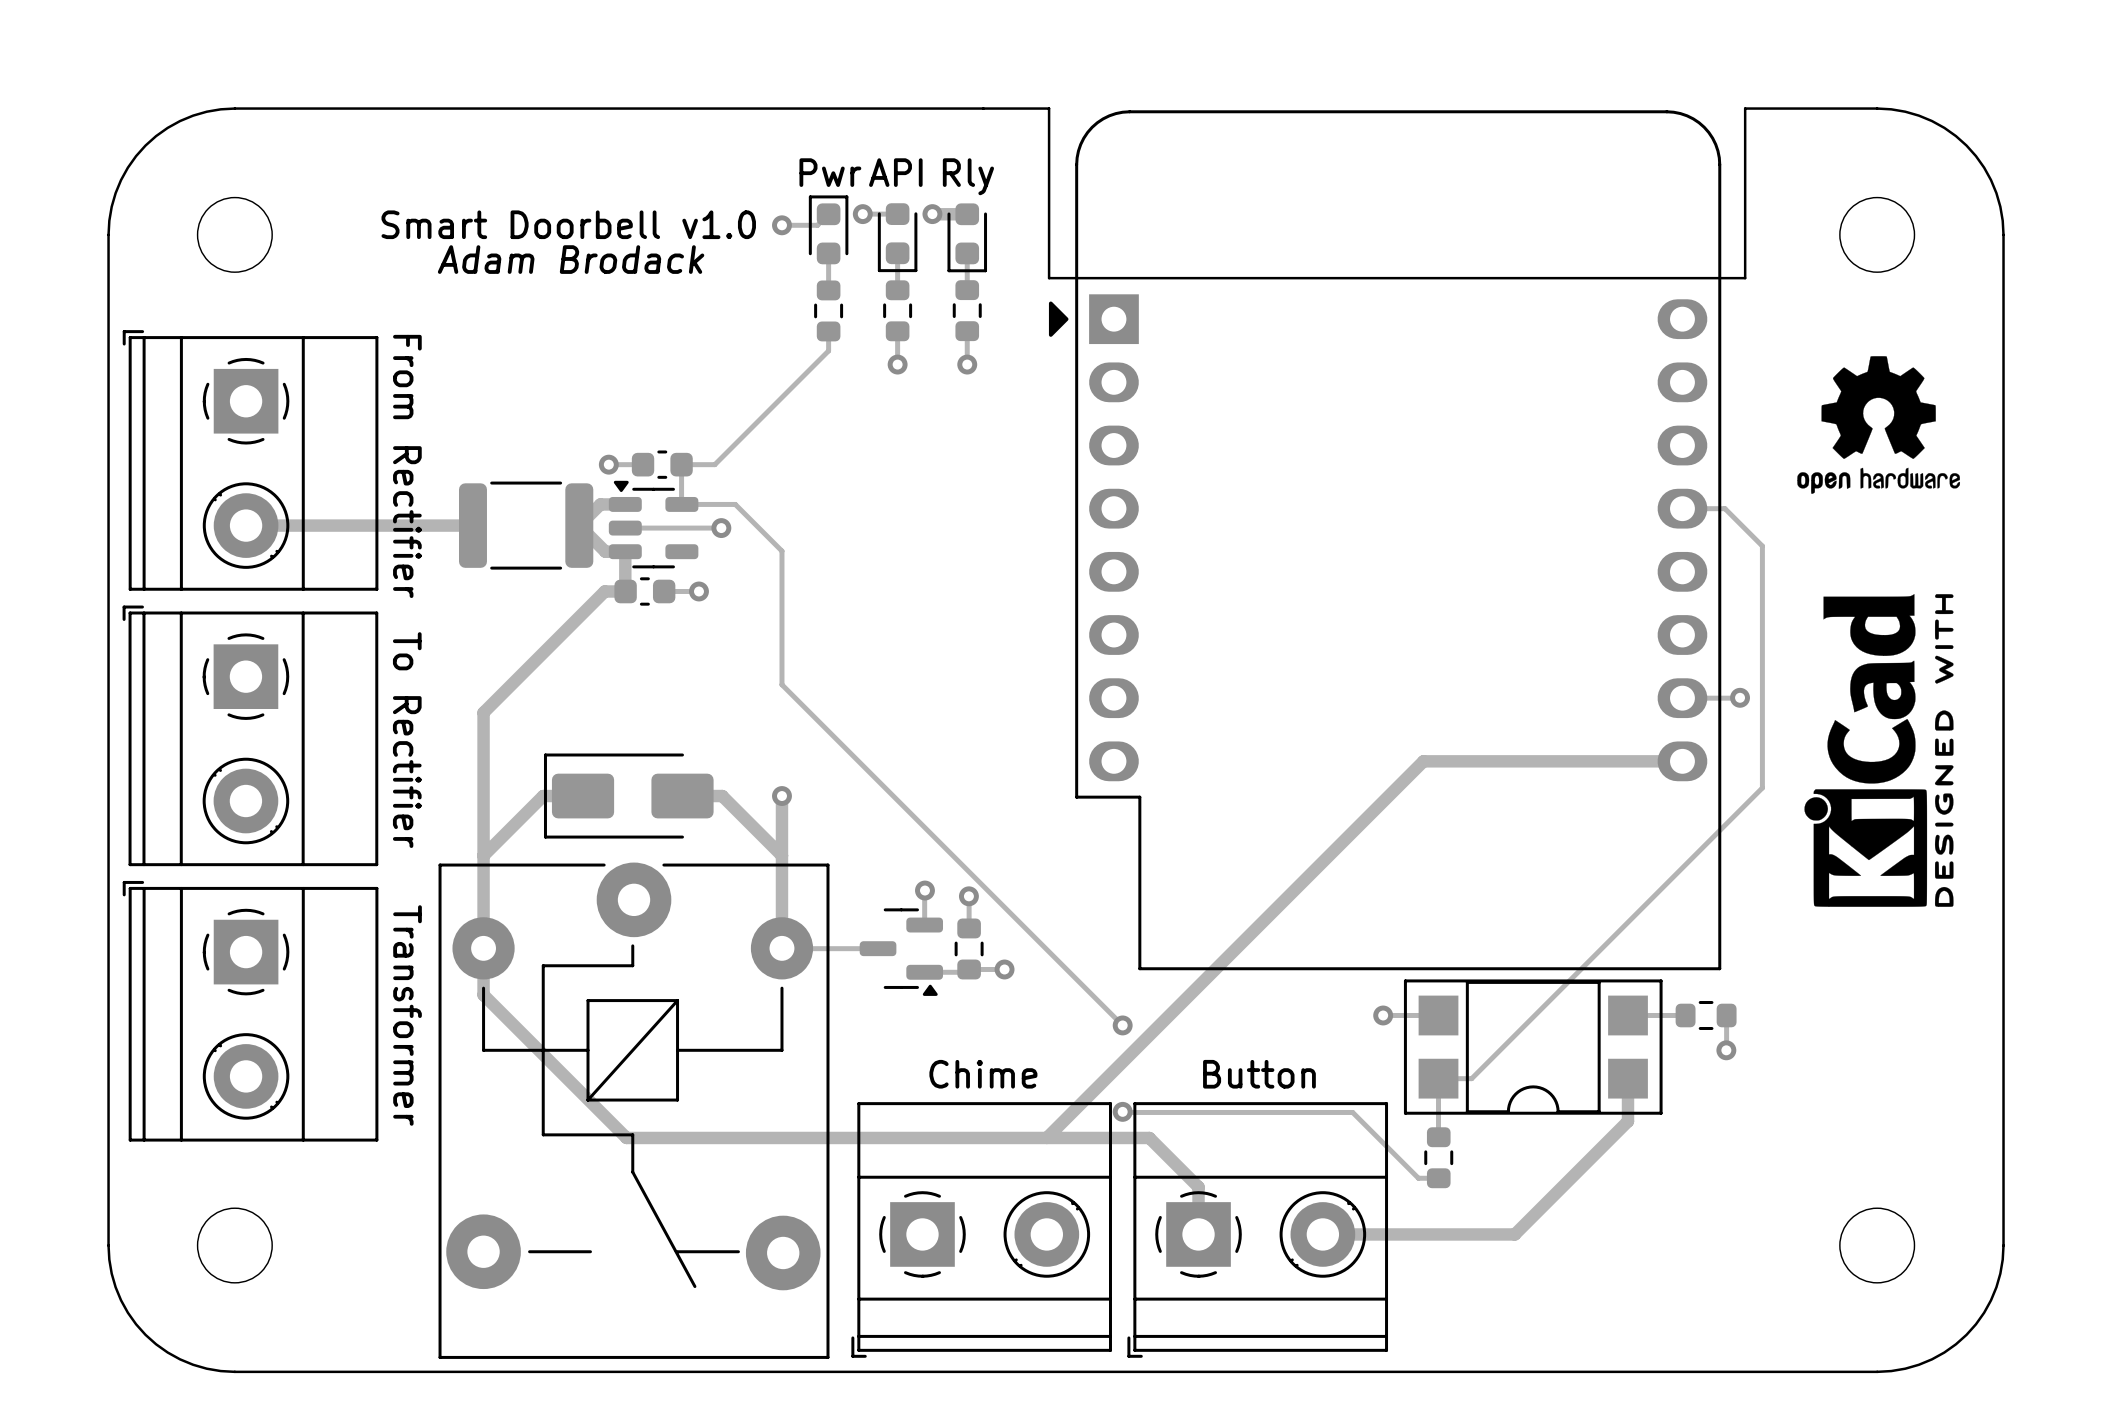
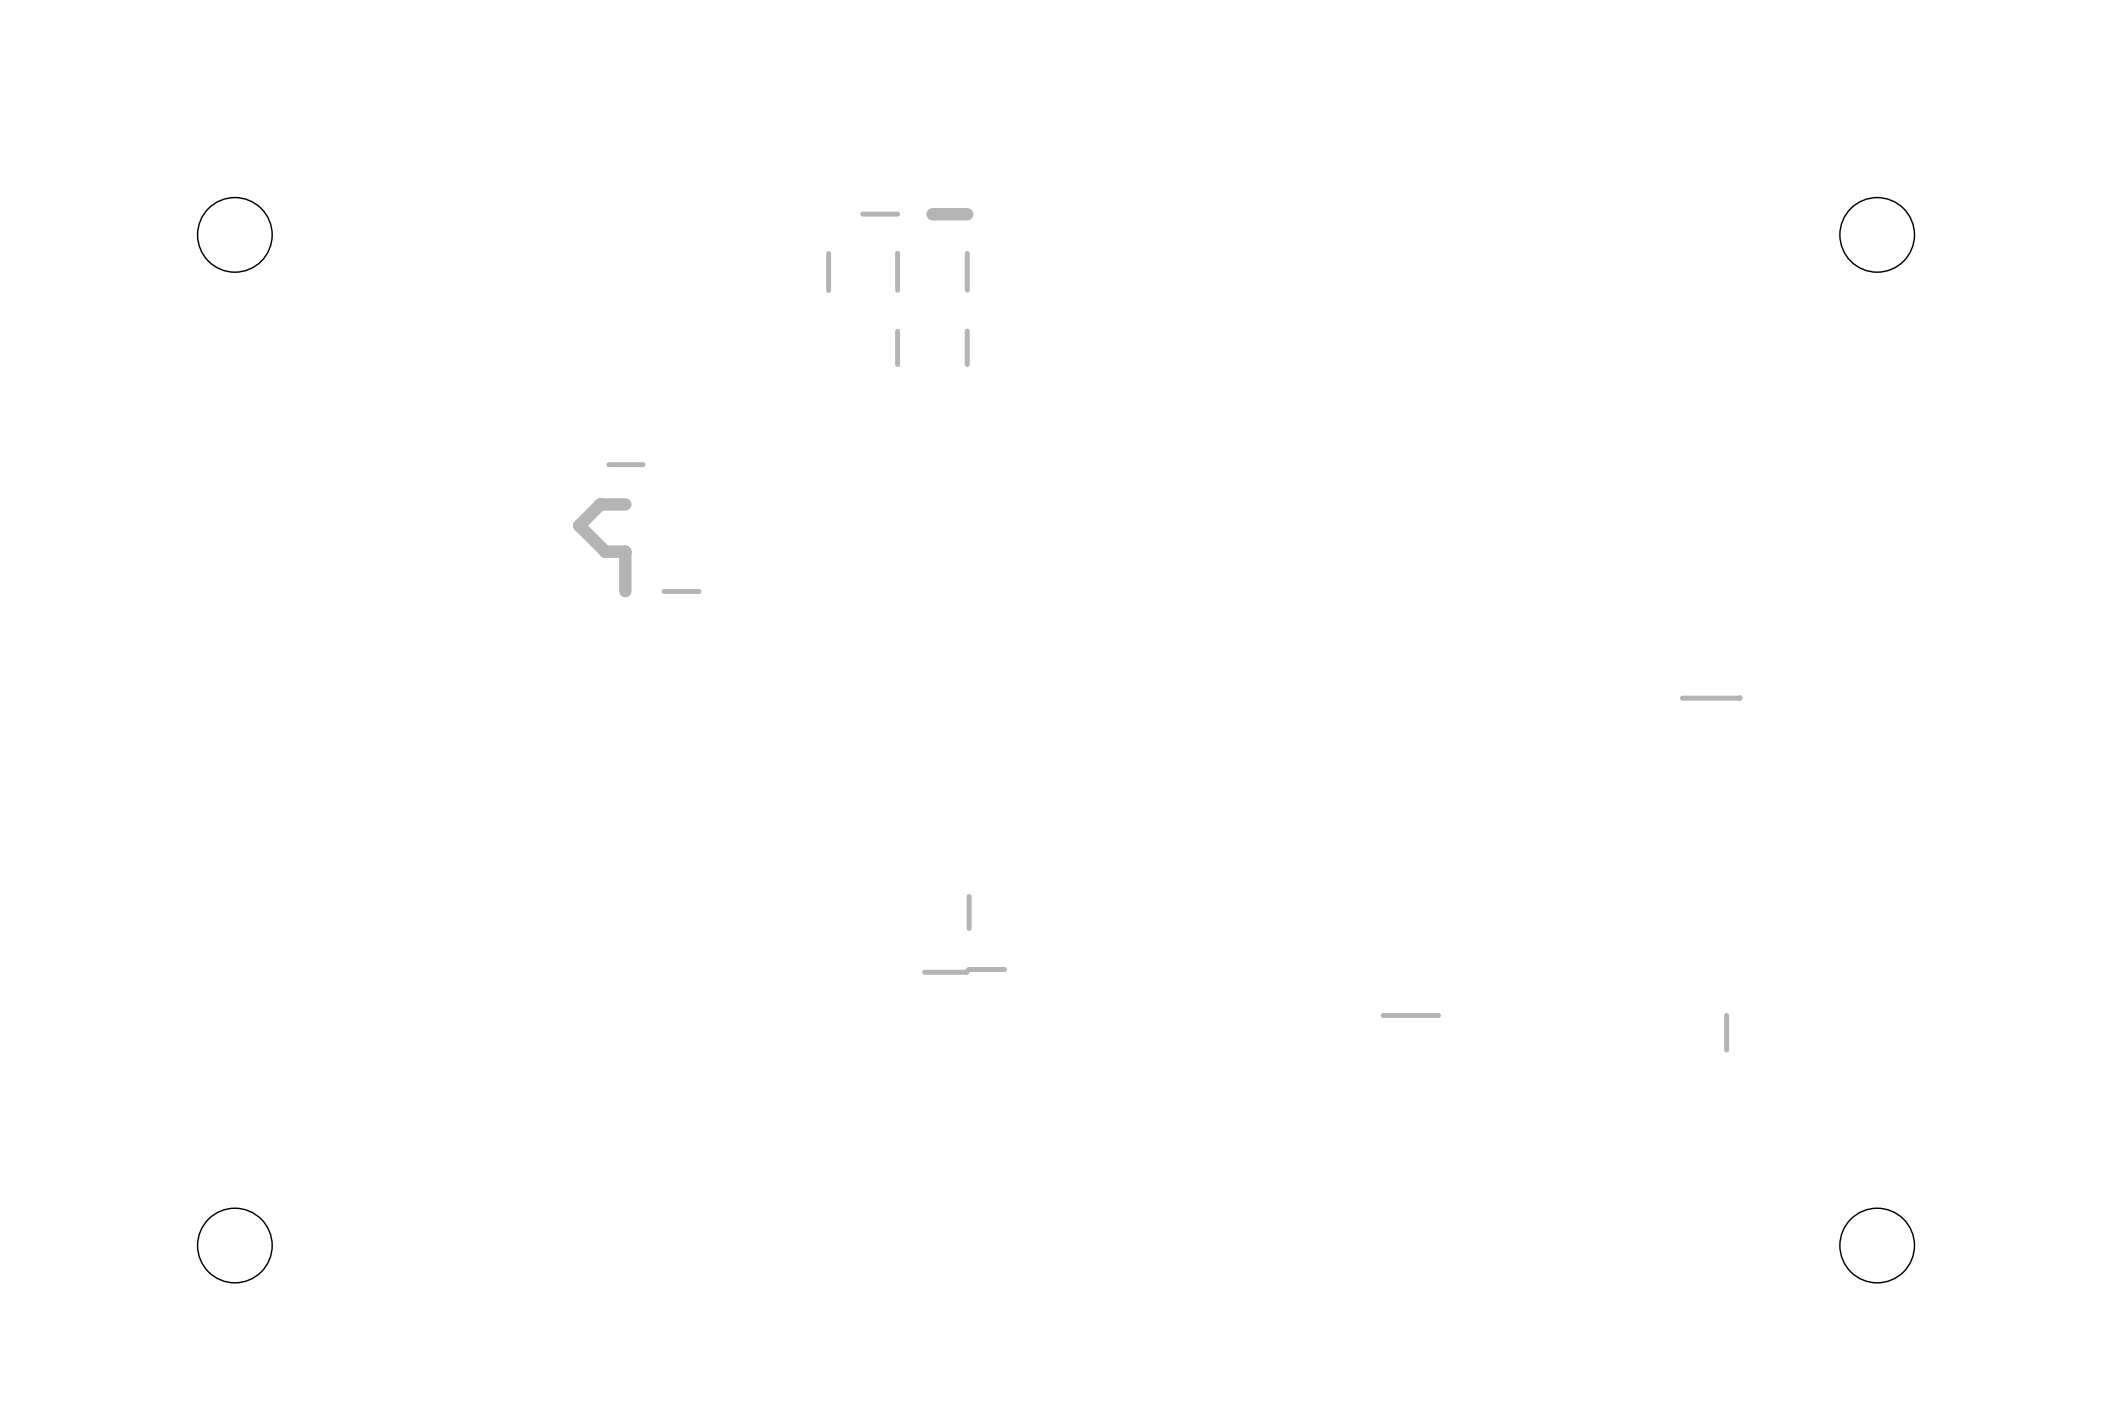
board edge: (234, 108) (1049, 108) (1049, 278) (1745, 278) (1745, 108) (1891, 109) (1918, 115) (1944, 127) (1966, 145) (1984, 167) (1991, 180) (2000, 206) (2003, 234) (2003, 1245) (2000, 1273) (1991, 1300) (1984, 1312) (1966, 1334) (1944, 1352) (1918, 1364) (1905, 1368) (1877, 1371) (234, 1371) (220, 1371) (193, 1364) (167, 1352) (145, 1334) (136, 1324) (121, 1300) (111, 1273) (108, 1245) (108, 234) (109, 220) (115, 193) (127, 167) (145, 145) (167, 127) (180, 121) (206, 111) (234, 108) -> none
text: Pwr (830, 172) -> none
text: API (895, 172) -> none
text: Rly (968, 176) -> none
track: (828, 214) (817, 225) (781, 225) -> none
via: (862, 214) -> none
via: (932, 214) -> none
text: Smart Doorbell v1.0 (568, 224) -> none
via: (781, 225) -> none
part: (828, 229) -> none
part: (897, 237) -> none
part: (967, 237) -> none
text: Adam Brodack (571, 259) -> none
part: (828, 310) -> none
part: (897, 310) -> none
part: (967, 310) -> none
track: (828, 331) (828, 350) (714, 464) (681, 464) (681, 504) -> none
drawing: [1797, 356, 1961, 494] -> none
via: (897, 364) -> none
via: (967, 364) -> none
part: (250, 460) -> none
via: (608, 464) -> none
part: (662, 464) -> none
text: From Rectifier (407, 466) -> none
track: (681, 504) (735, 504) (781, 551) (781, 684) (1122, 1025) -> none
track: (1682, 508) (1724, 508) (1762, 546) (1762, 787) (1471, 1078) (1438, 1078) (1438, 1136) -> none
part: (653, 524) -> none
track: (246, 525) (472, 525) -> none
part: (526, 525) -> none
track: (625, 528) (721, 528) -> none
via: (721, 528) -> none
part: (1385, 540) -> none
track: (625, 591) (604, 591) (483, 712) (483, 994) (626, 1137) (1149, 1137) (1198, 1187) (1198, 1234) -> none
part: (644, 591) -> none
via: (698, 591) -> none
drawing: [1804, 594, 1954, 907] -> none
via: (1740, 697) -> none
part: (250, 735) -> none
text: To Rectifier (407, 740) -> none
track: (1682, 761) (1423, 761) (1046, 1137) -> none
track: (583, 796) (543, 796) (483, 855) -> none
part: (628, 796) -> none
track: (682, 796) (722, 796) (781, 855) -> none
track: (781, 796) (781, 948) -> none
via: (781, 796) -> none
track: (924, 890) (924, 925) -> none
via: (924, 890) -> none
via: (968, 896) -> none
track: (782, 948) (878, 948) -> none
part: (969, 948) -> none
part: (901, 952) -> none
via: (1004, 969) -> none
part: (250, 1011) -> none
text: Transformer (407, 1015) -> none
via: (1383, 1015) -> none
track: (1628, 1015) (1685, 1015) -> none
part: (1706, 1015) -> none
via: (1122, 1025) -> none
part: (1533, 1047) -> none
via: (1726, 1050) -> none
text: Chime (983, 1074) -> none
text: Button (1259, 1074) -> none
track: (1628, 1078) (1628, 1121) (1514, 1234) (1322, 1234) -> none
part: (634, 1110) -> none
via: (1122, 1111) -> none
track: (1122, 1112) (1352, 1112) (1418, 1178) (1438, 1178) -> none
part: (1438, 1157) -> none
part: (981, 1229) -> none
part: (1257, 1229) -> none

